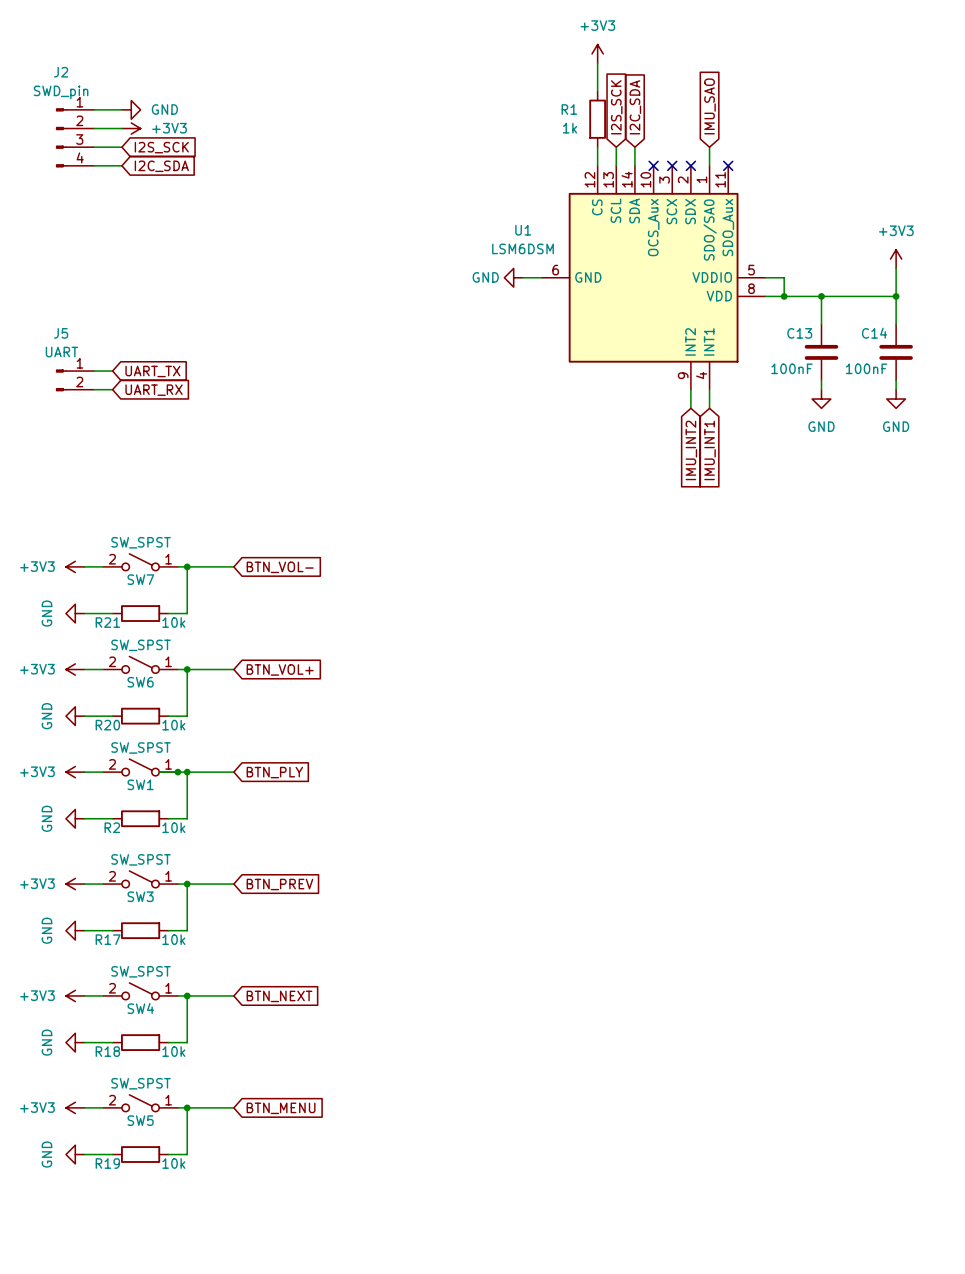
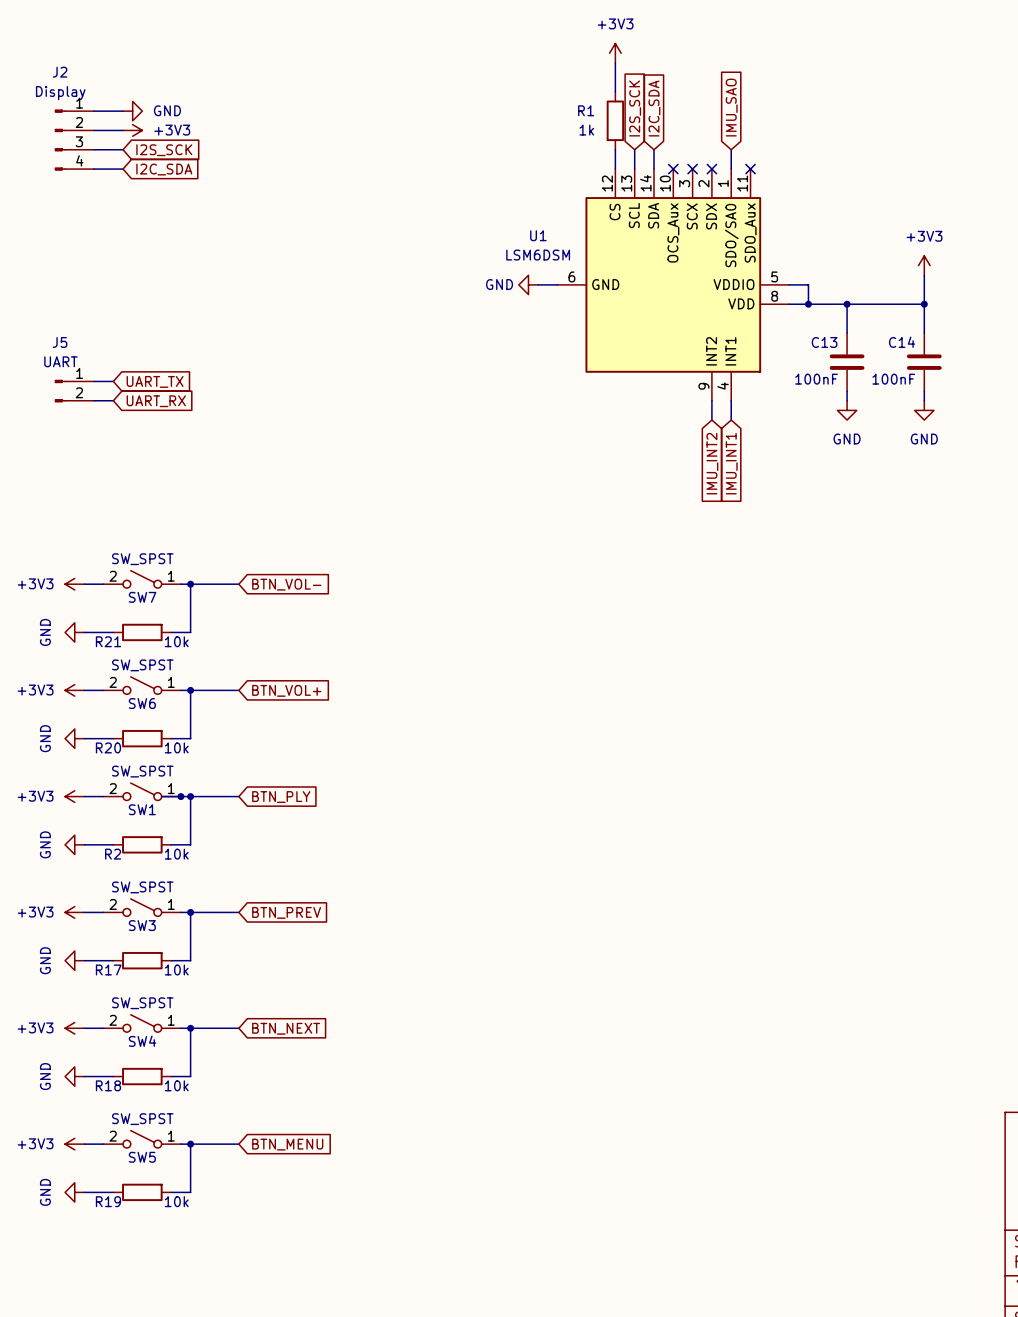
J2 value: SWD_pin (61, 92) -> Display (60, 93)

